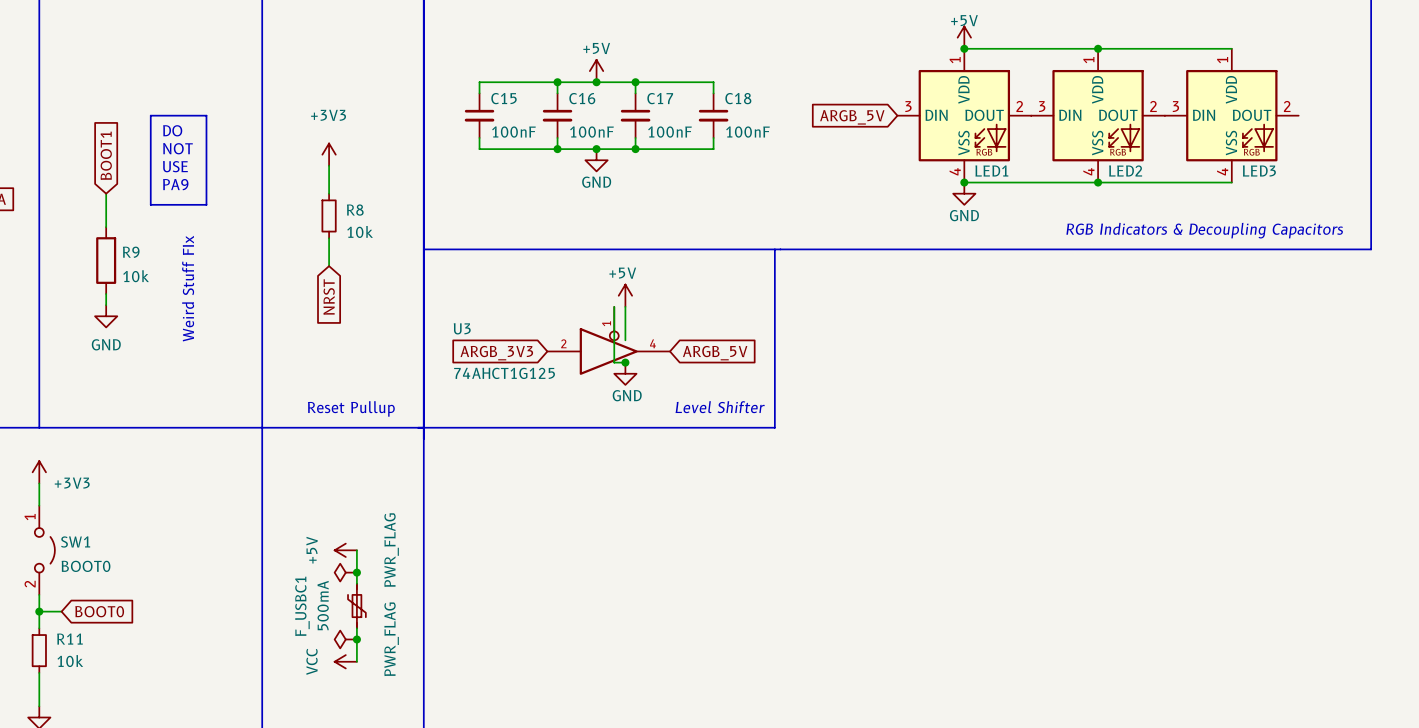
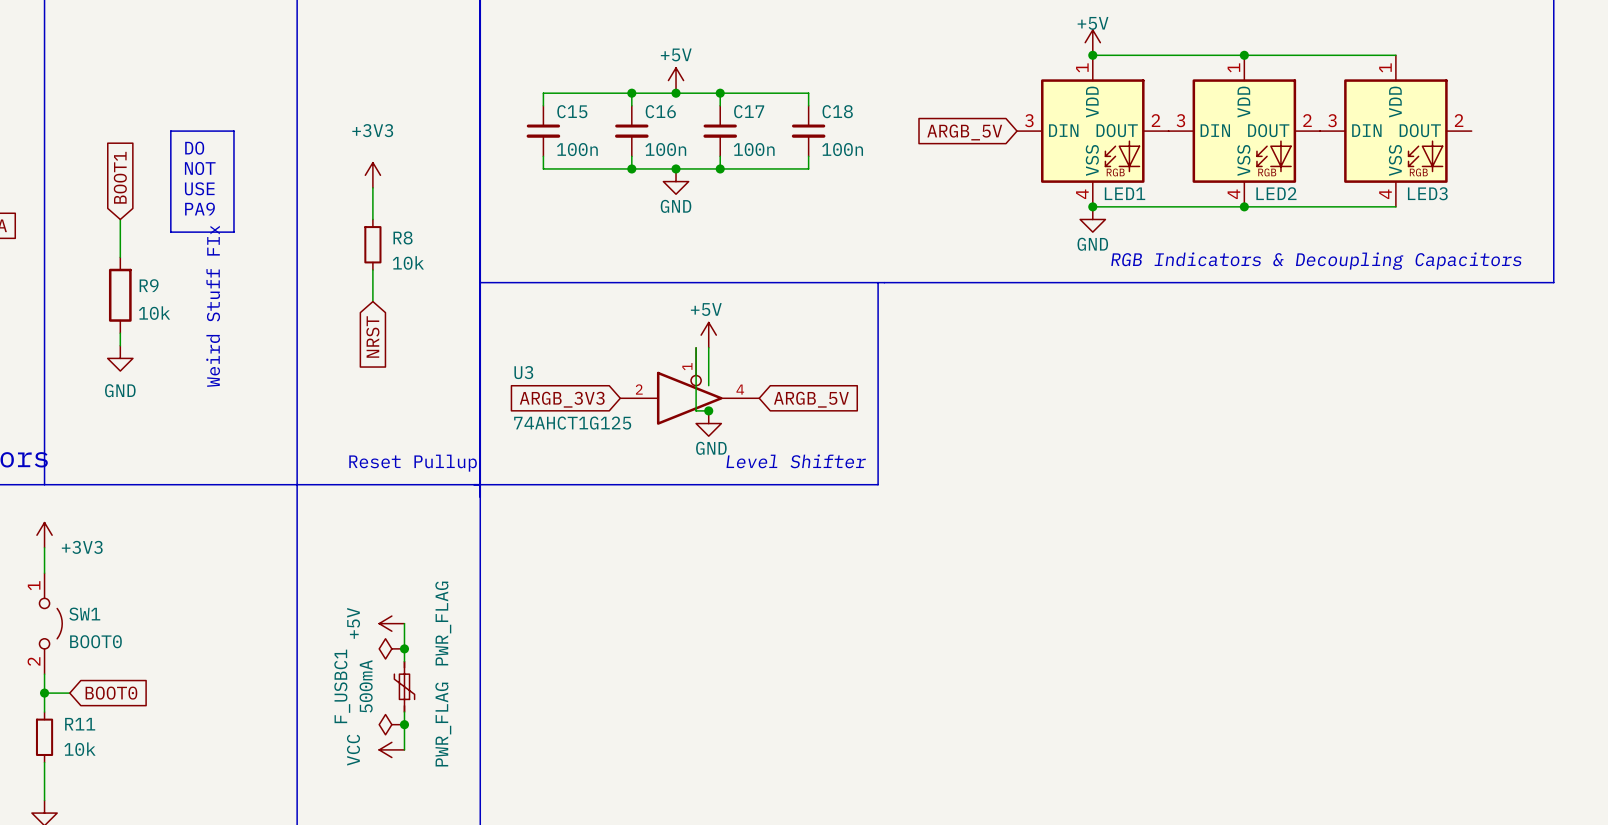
C15 value: 100nF (513, 132) -> 100n (577, 149)
C16 value: 100nF (591, 132) -> 100n (665, 149)
C17 value: 100nF (669, 132) -> 100n (754, 149)
C18 value: 100nF (747, 132) -> 100n (842, 149)

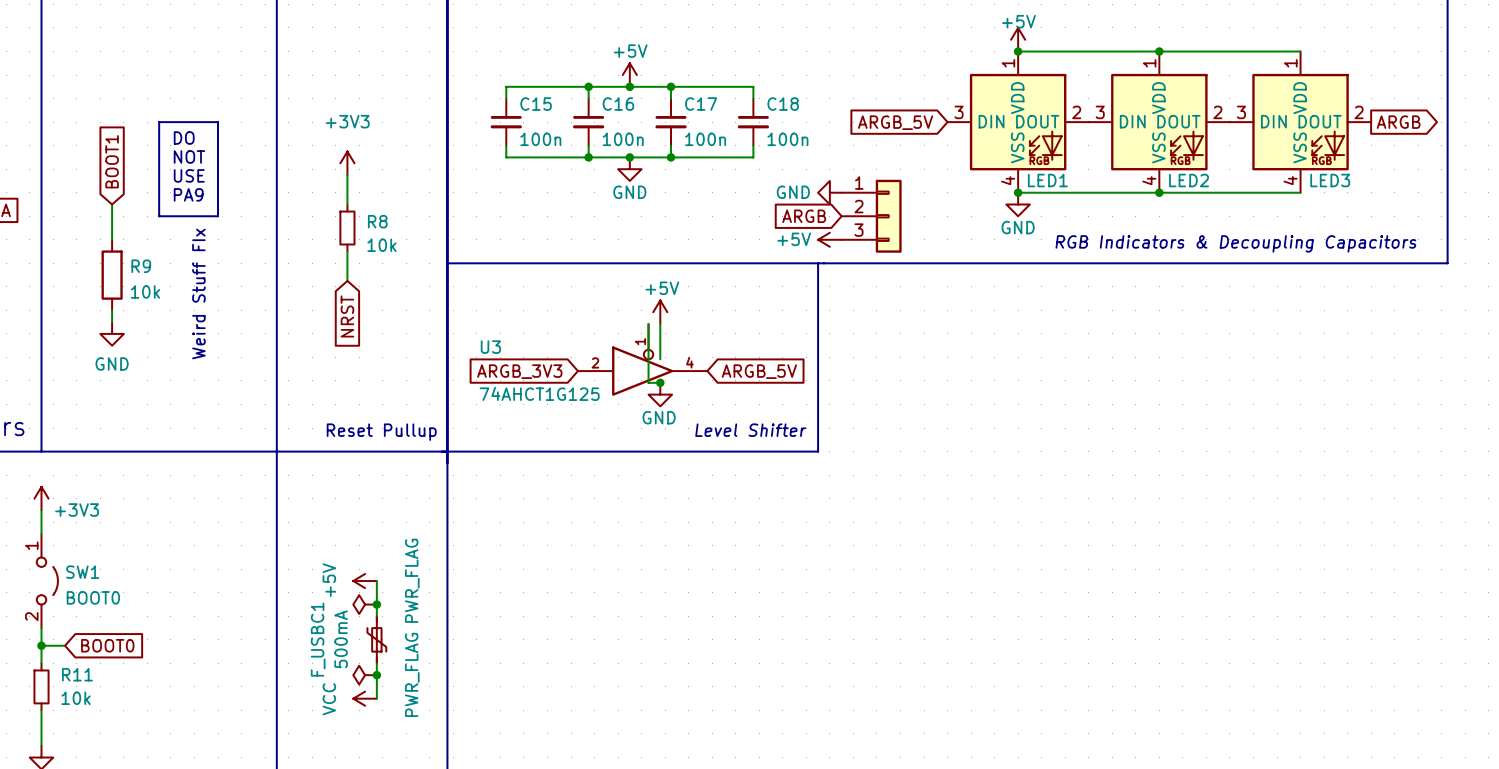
global label: none -> ARGB (1398, 122)
power symbol: none -> GND (829, 192)
global label: none -> ARGB (804, 216)
part: none -> (871, 216)
power symbol: none -> +5V (829, 239)

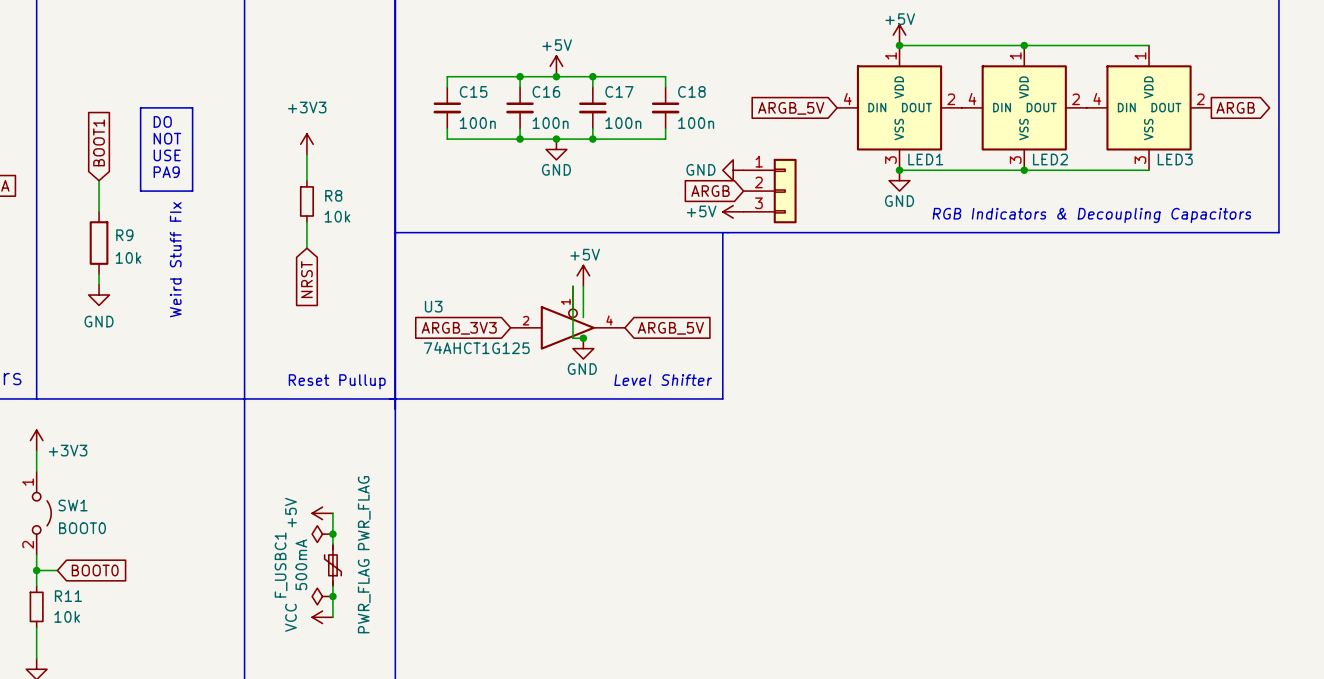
LED1 symbol: [947, 51, 1089, 193] -> [837, 45, 962, 171]
LED2 symbol: [1088, 51, 1230, 193] -> [961, 45, 1087, 171]
LED3 symbol: [1229, 51, 1372, 193] -> [1086, 45, 1212, 171]

